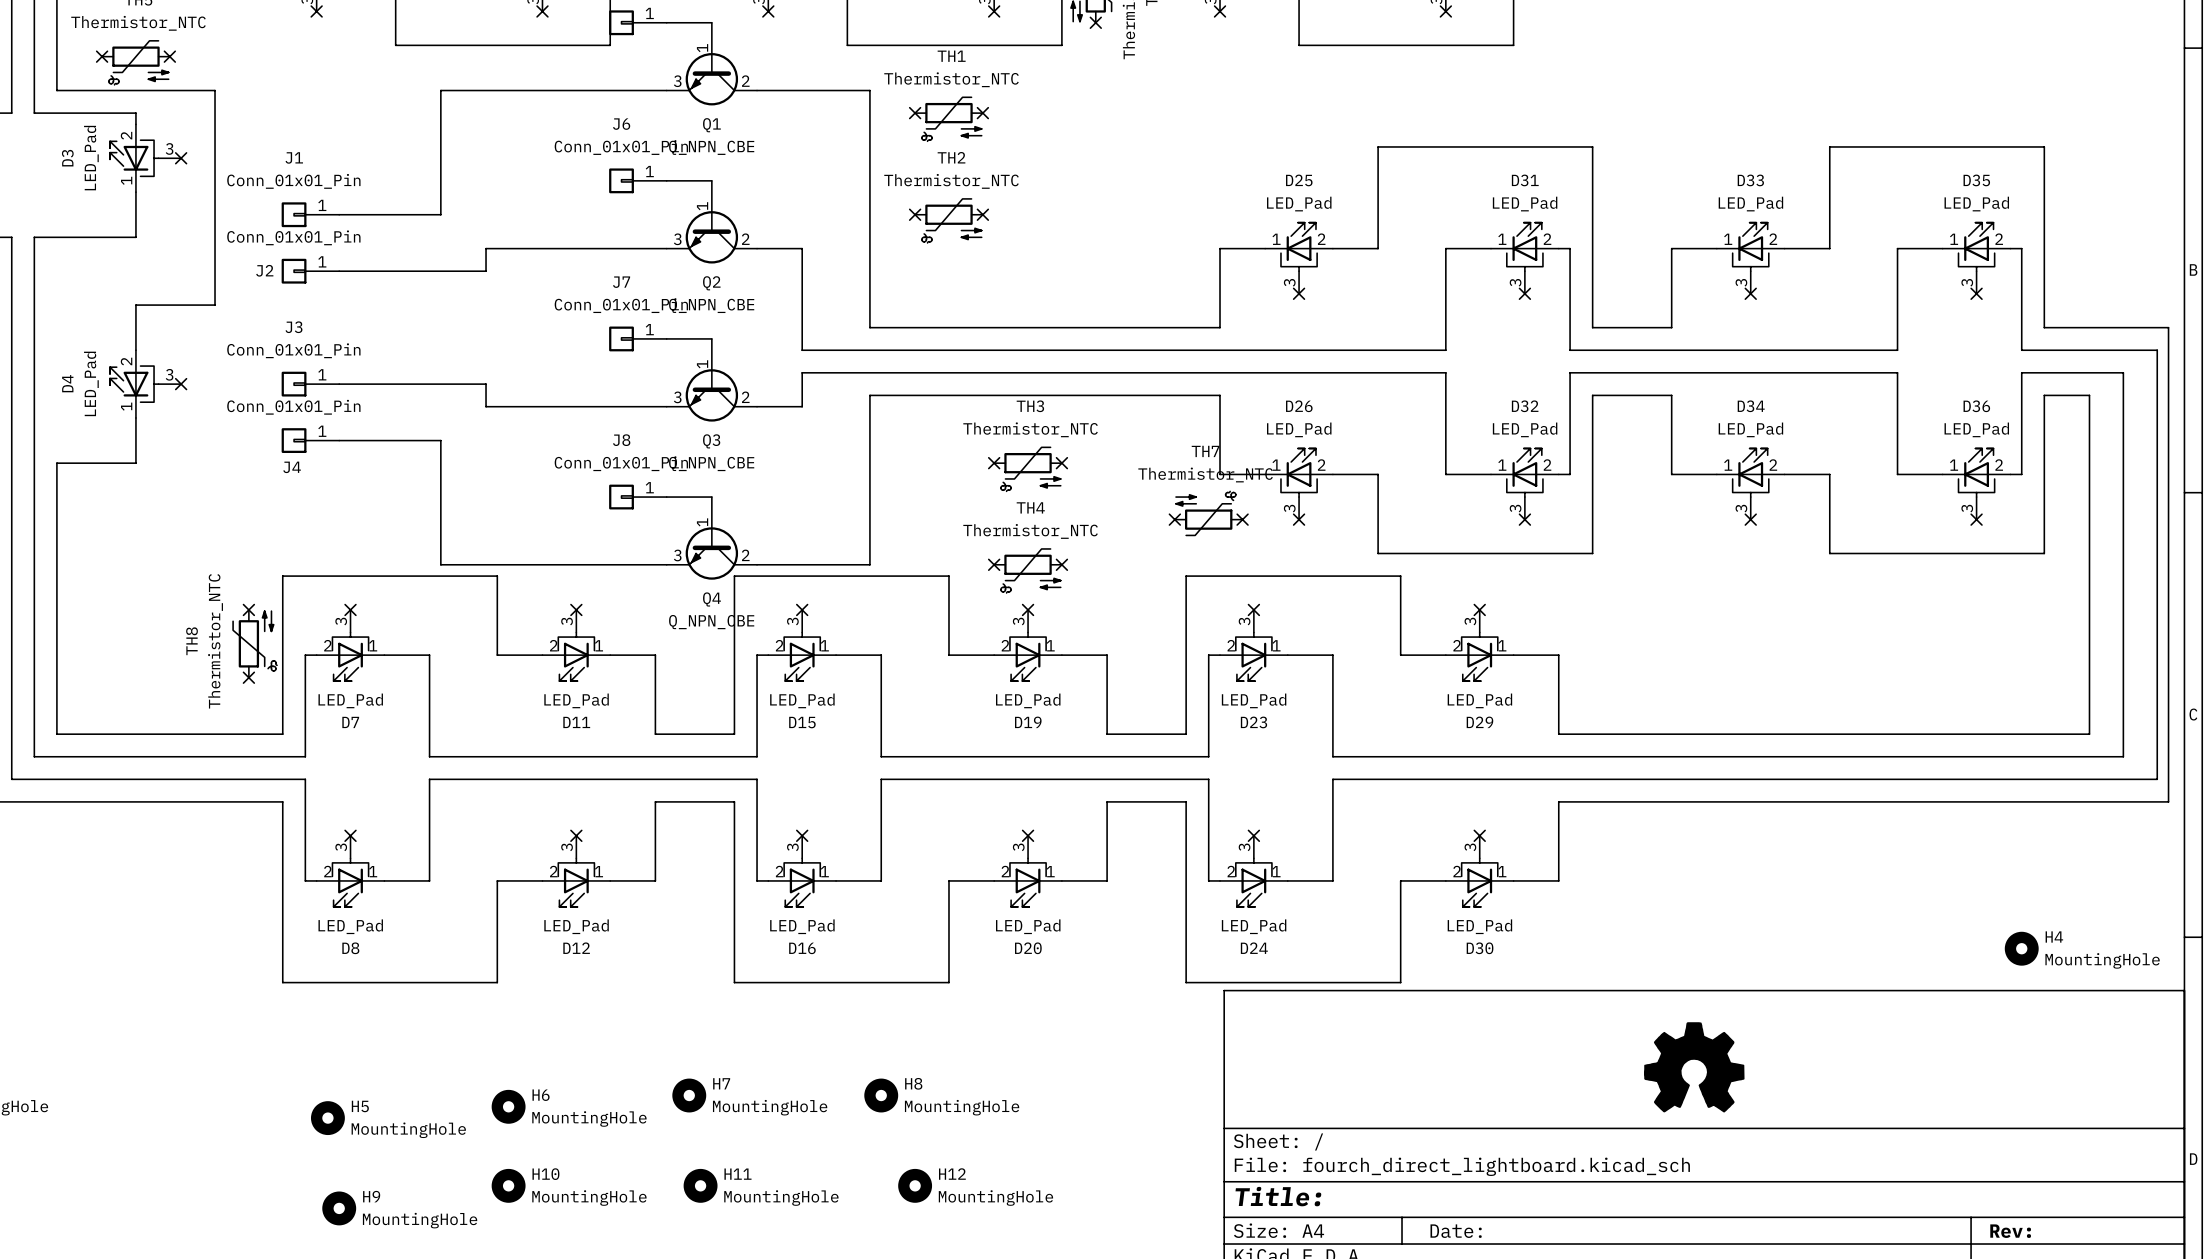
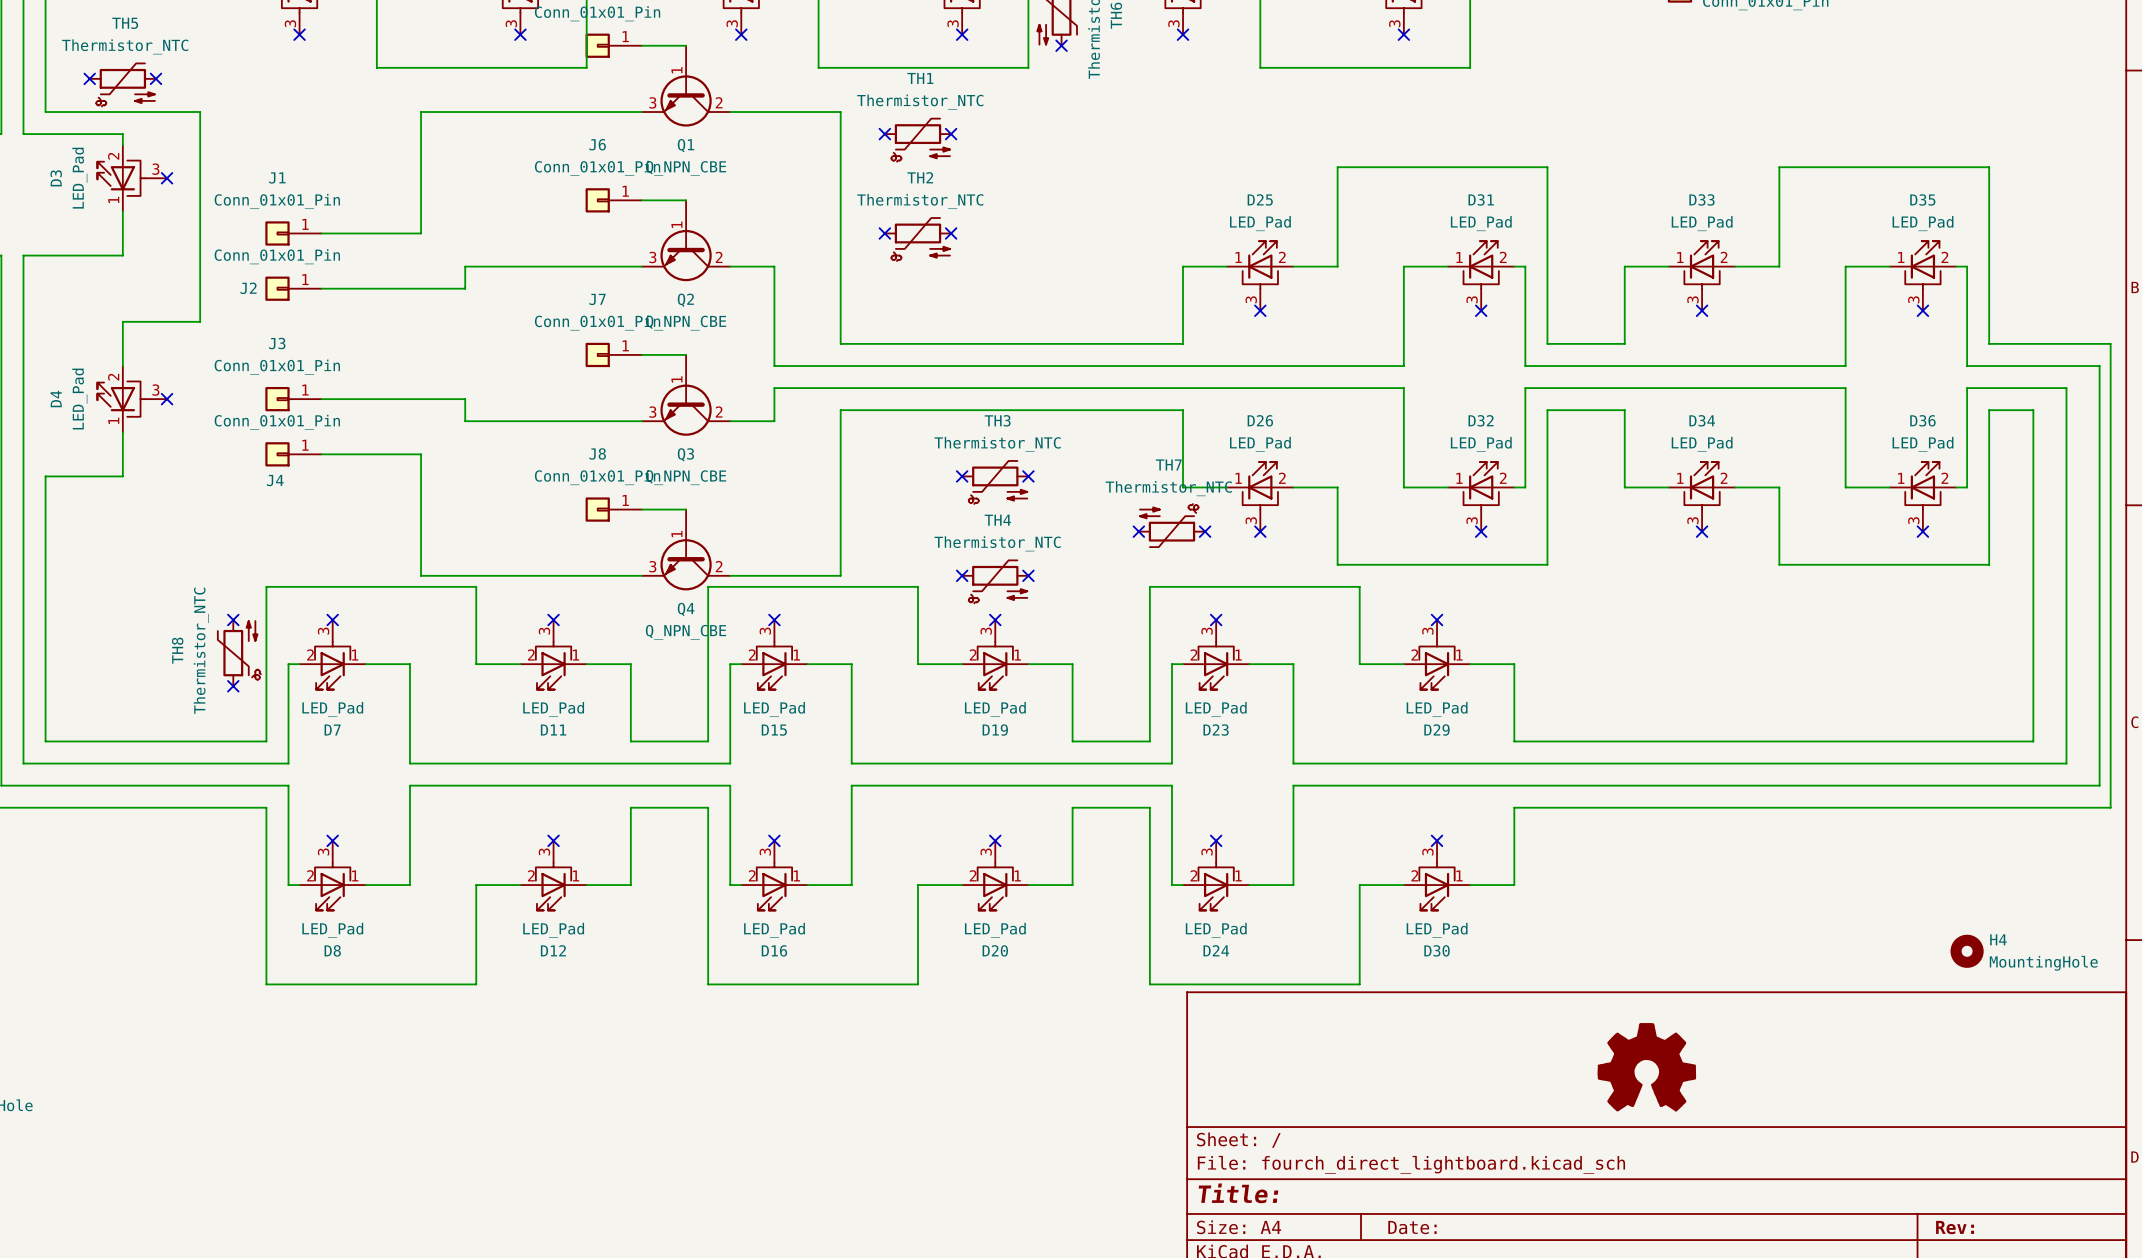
H7: MountingHole (689, 1095) -> none
H8: MountingHole (881, 1095) -> none
H6: MountingHole (508, 1106) -> none
H5: MountingHole (327, 1118) -> none
H10: MountingHole (508, 1185) -> none
H11: MountingHole (700, 1185) -> none
H12: MountingHole (915, 1185) -> none
H9: MountingHole (339, 1208) -> none

